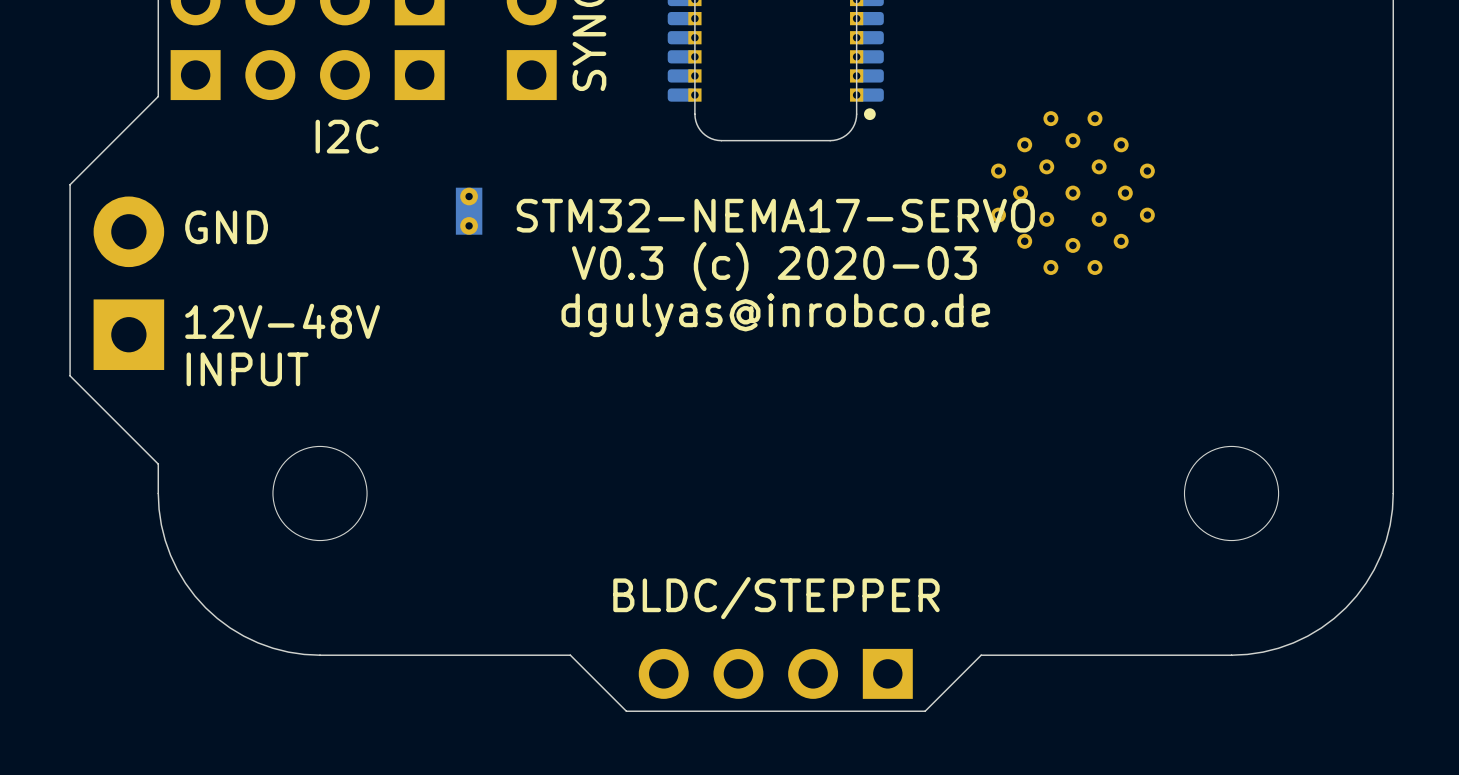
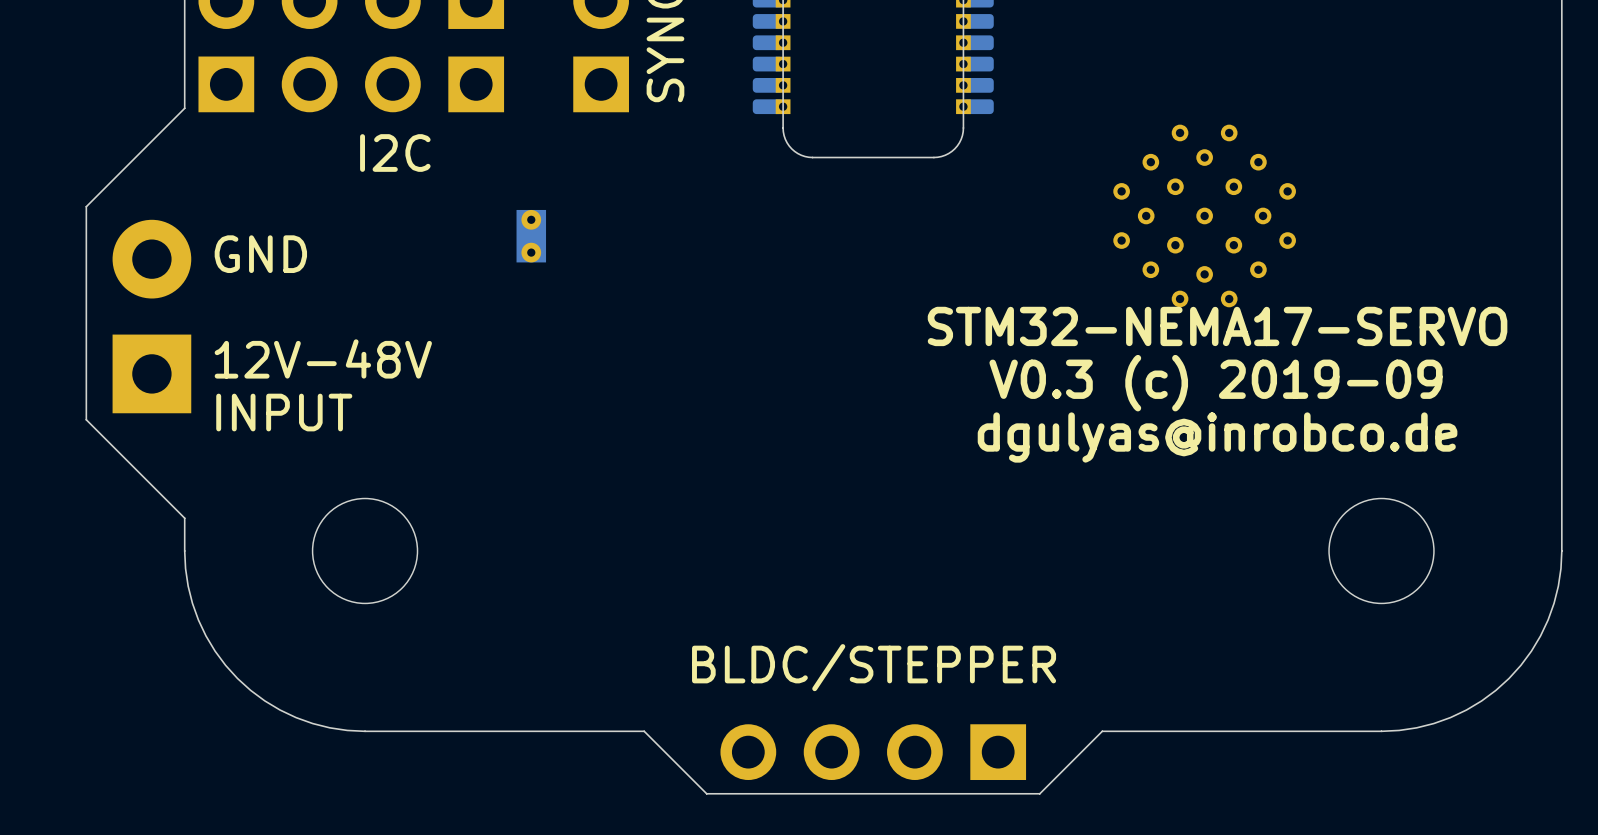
drawing: [863, 108, 876, 121] -> none
text position: STM32-NEMA17-SERVO (775, 215) -> STM32-NEMA17-SERVO (1217, 326)
text: V0.3 (c) 2020-03 (774, 266) -> none
text position: dgulyas@inrobco.de (775, 315) -> dgulyas@inrobco.de (1217, 437)
text: none -> V0.3 (c) 2019-09 (1215, 383)

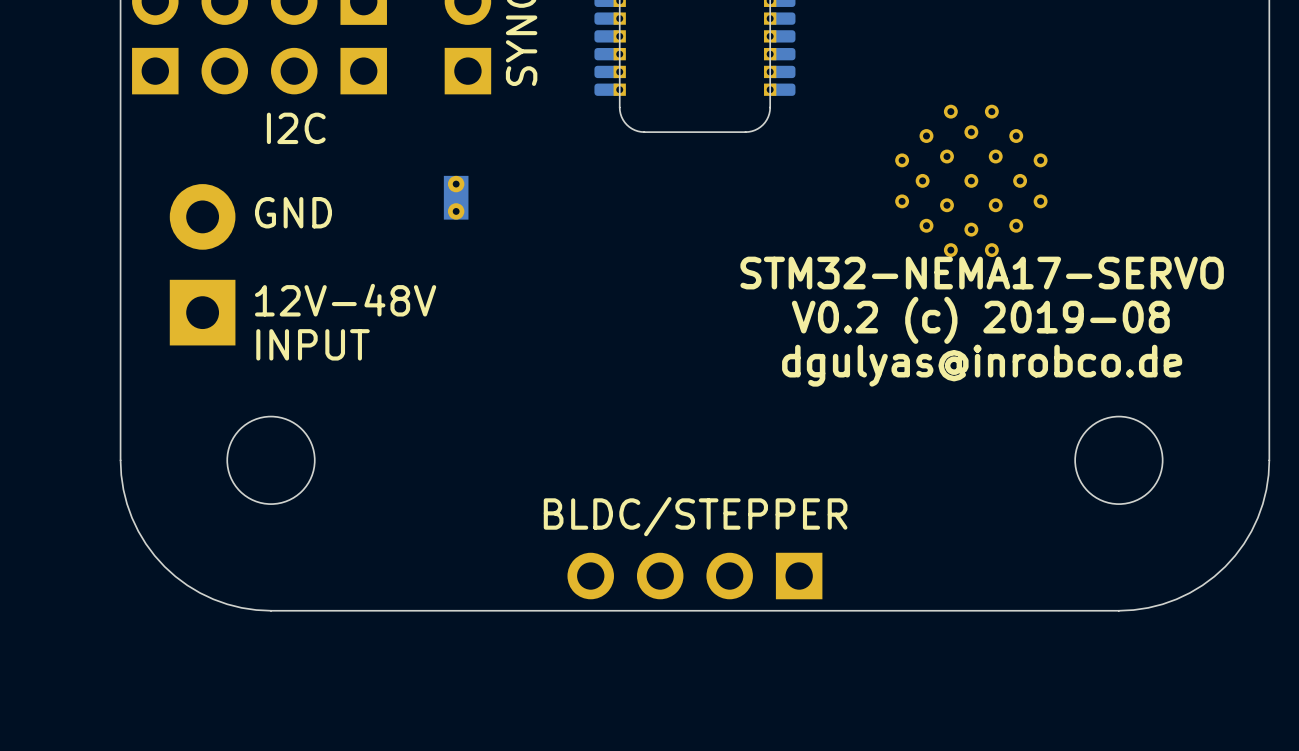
board edge: (184, 108) (86, 206) (86, 419) (184, 518) -> (120, 91) (120, 432)
part position: (531, 236) -> (456, 197)
text position: GND (260, 254) -> GND (293, 212)
part position: (151, 316) -> (202, 264)
text position: 12V-48V (323, 358) -> 12V-48V (345, 300)
text: V0.3 (c) 2019-09 (1215, 383) -> V0.2 (c) 2019-08 (980, 320)
text position: INPUT (284, 412) -> INPUT (313, 344)
text position: BLDC/STEPPER (874, 667) -> BLDC/STEPPER (695, 516)
board edge: (1102, 731) (1039, 793) (706, 793) (644, 731) -> (885, 610) (503, 610)
part position: (873, 752) -> (694, 576)

